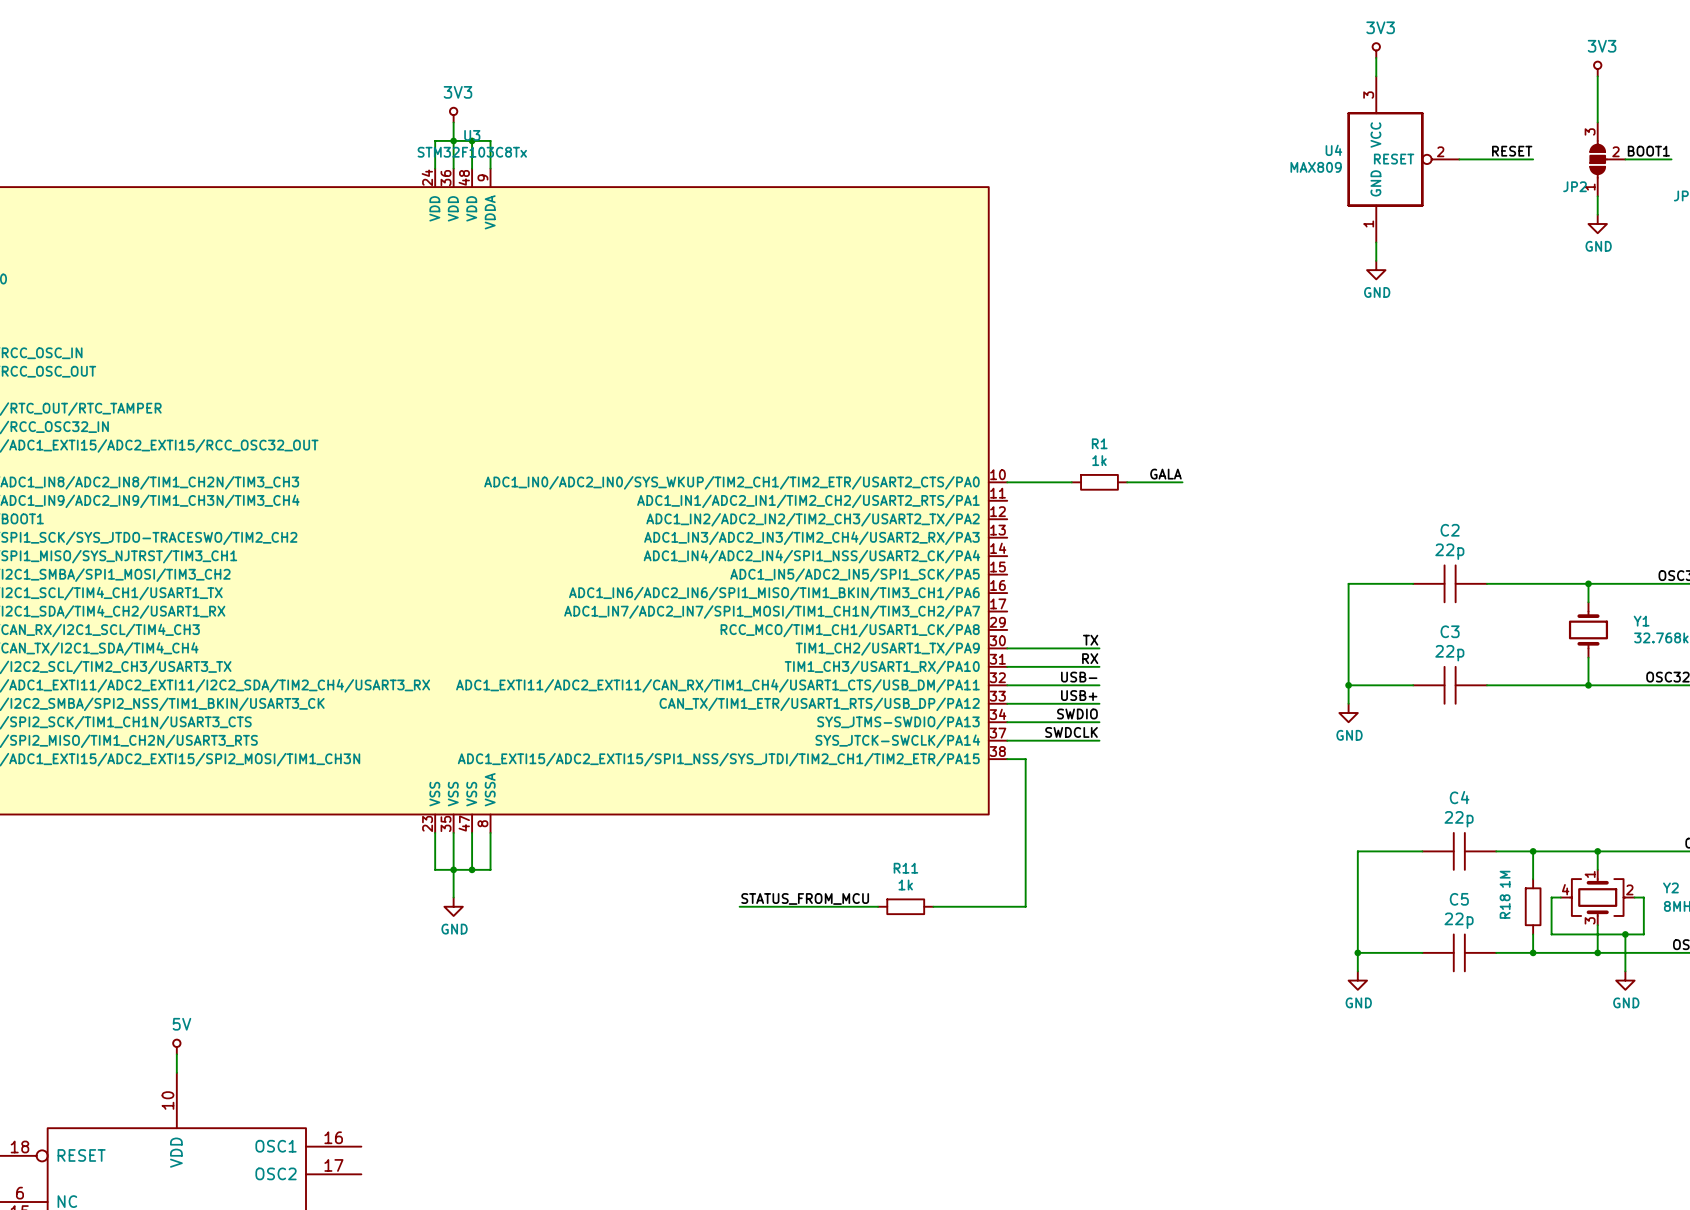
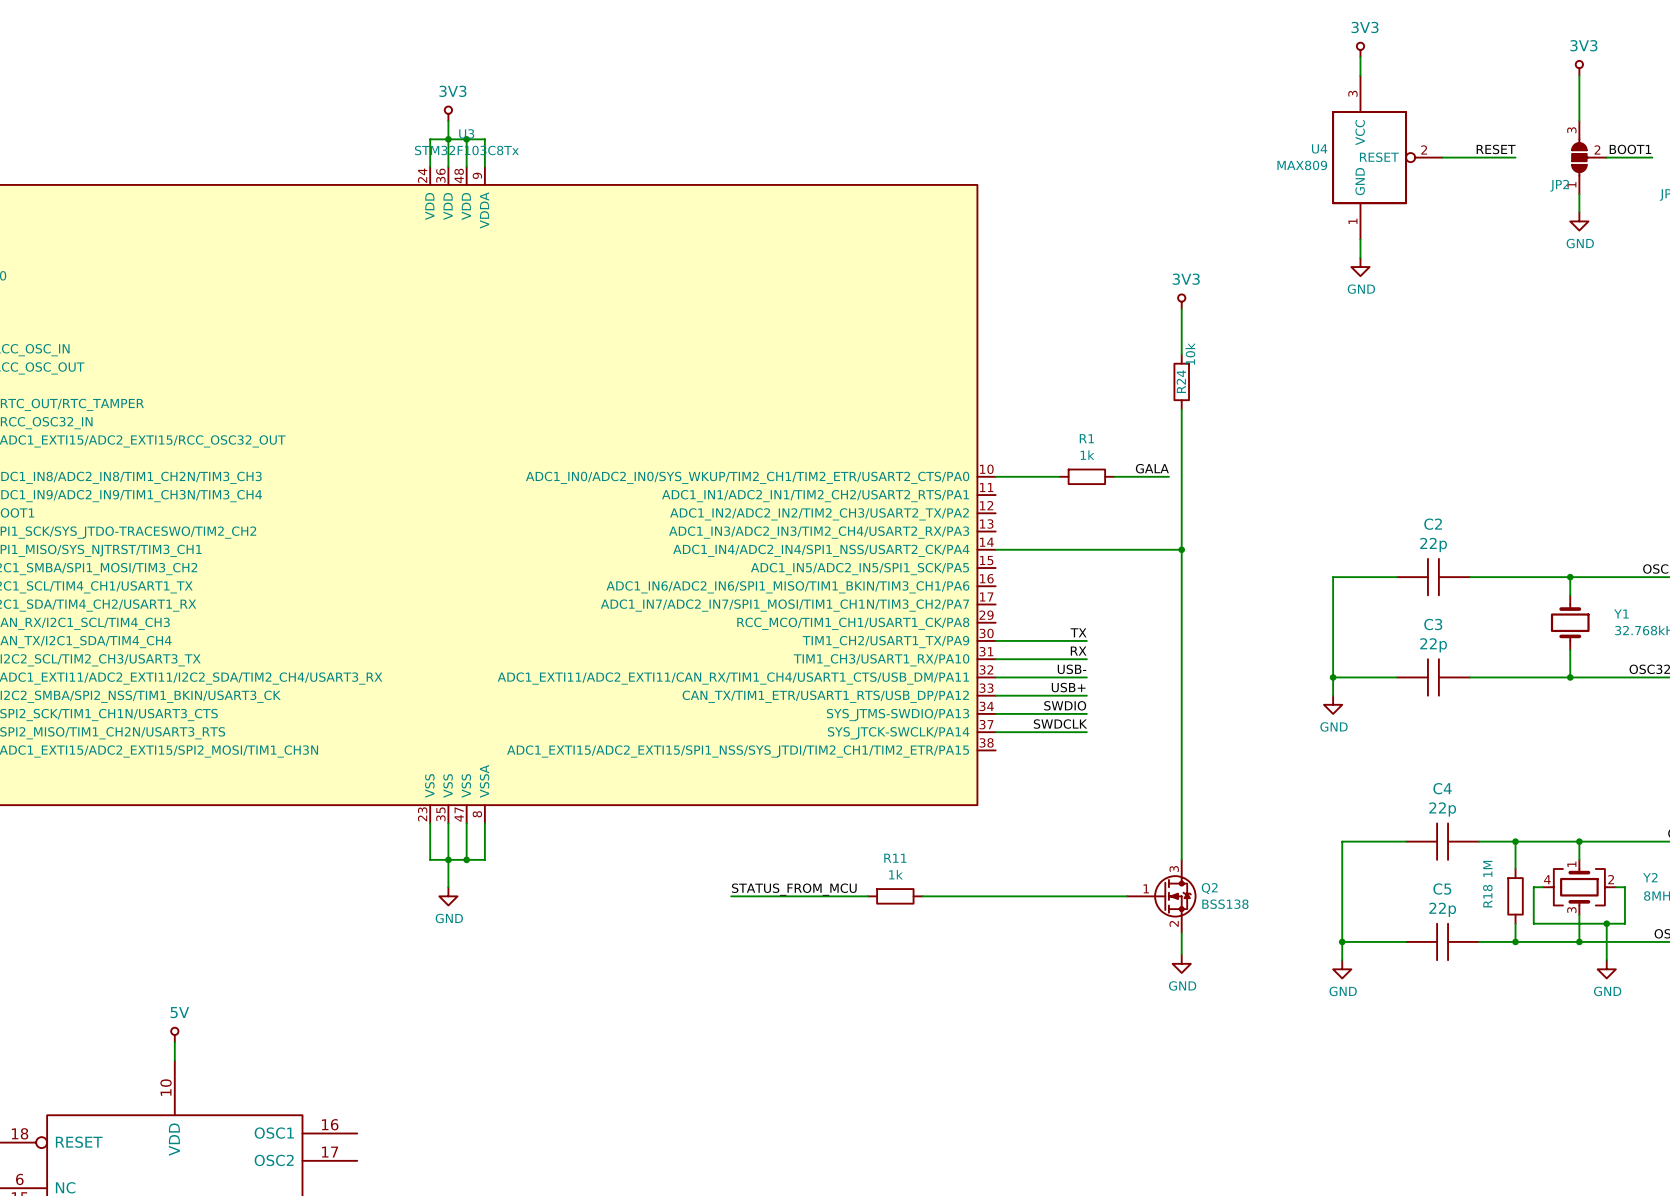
power symbol: none -> 3V3 (1181, 301)
wire: none -> (1181, 308) (1181, 354)
R24: none -> 10k (1181, 381)
wire: none -> (1181, 409) (1181, 859)
wire: none -> (995, 549) (1181, 549)
junction: none -> (1181, 549)
wire: (1007, 759) (1025, 759) (1025, 906) -> (1126, 896) (1013, 896)
Q2: none -> BSS138 (1161, 896)
wire: none -> (1181, 932) (1181, 954)
power symbol: none -> GND (1181, 963)

